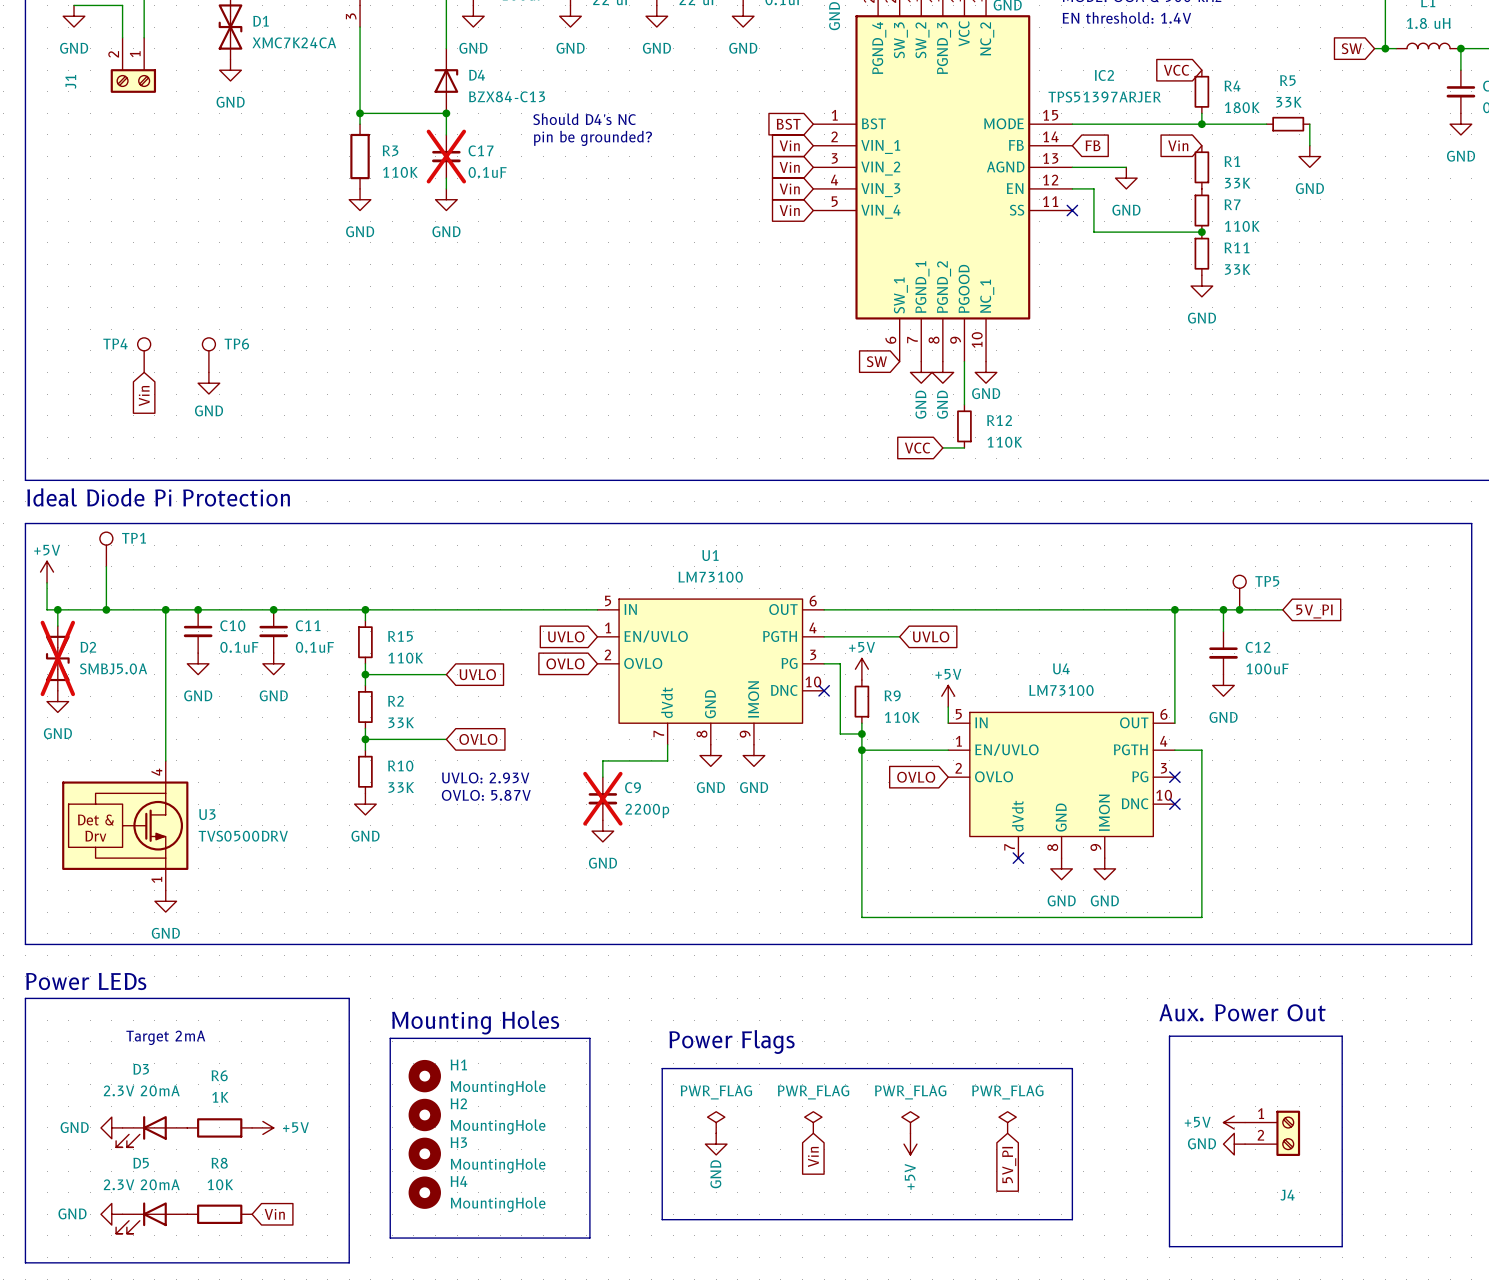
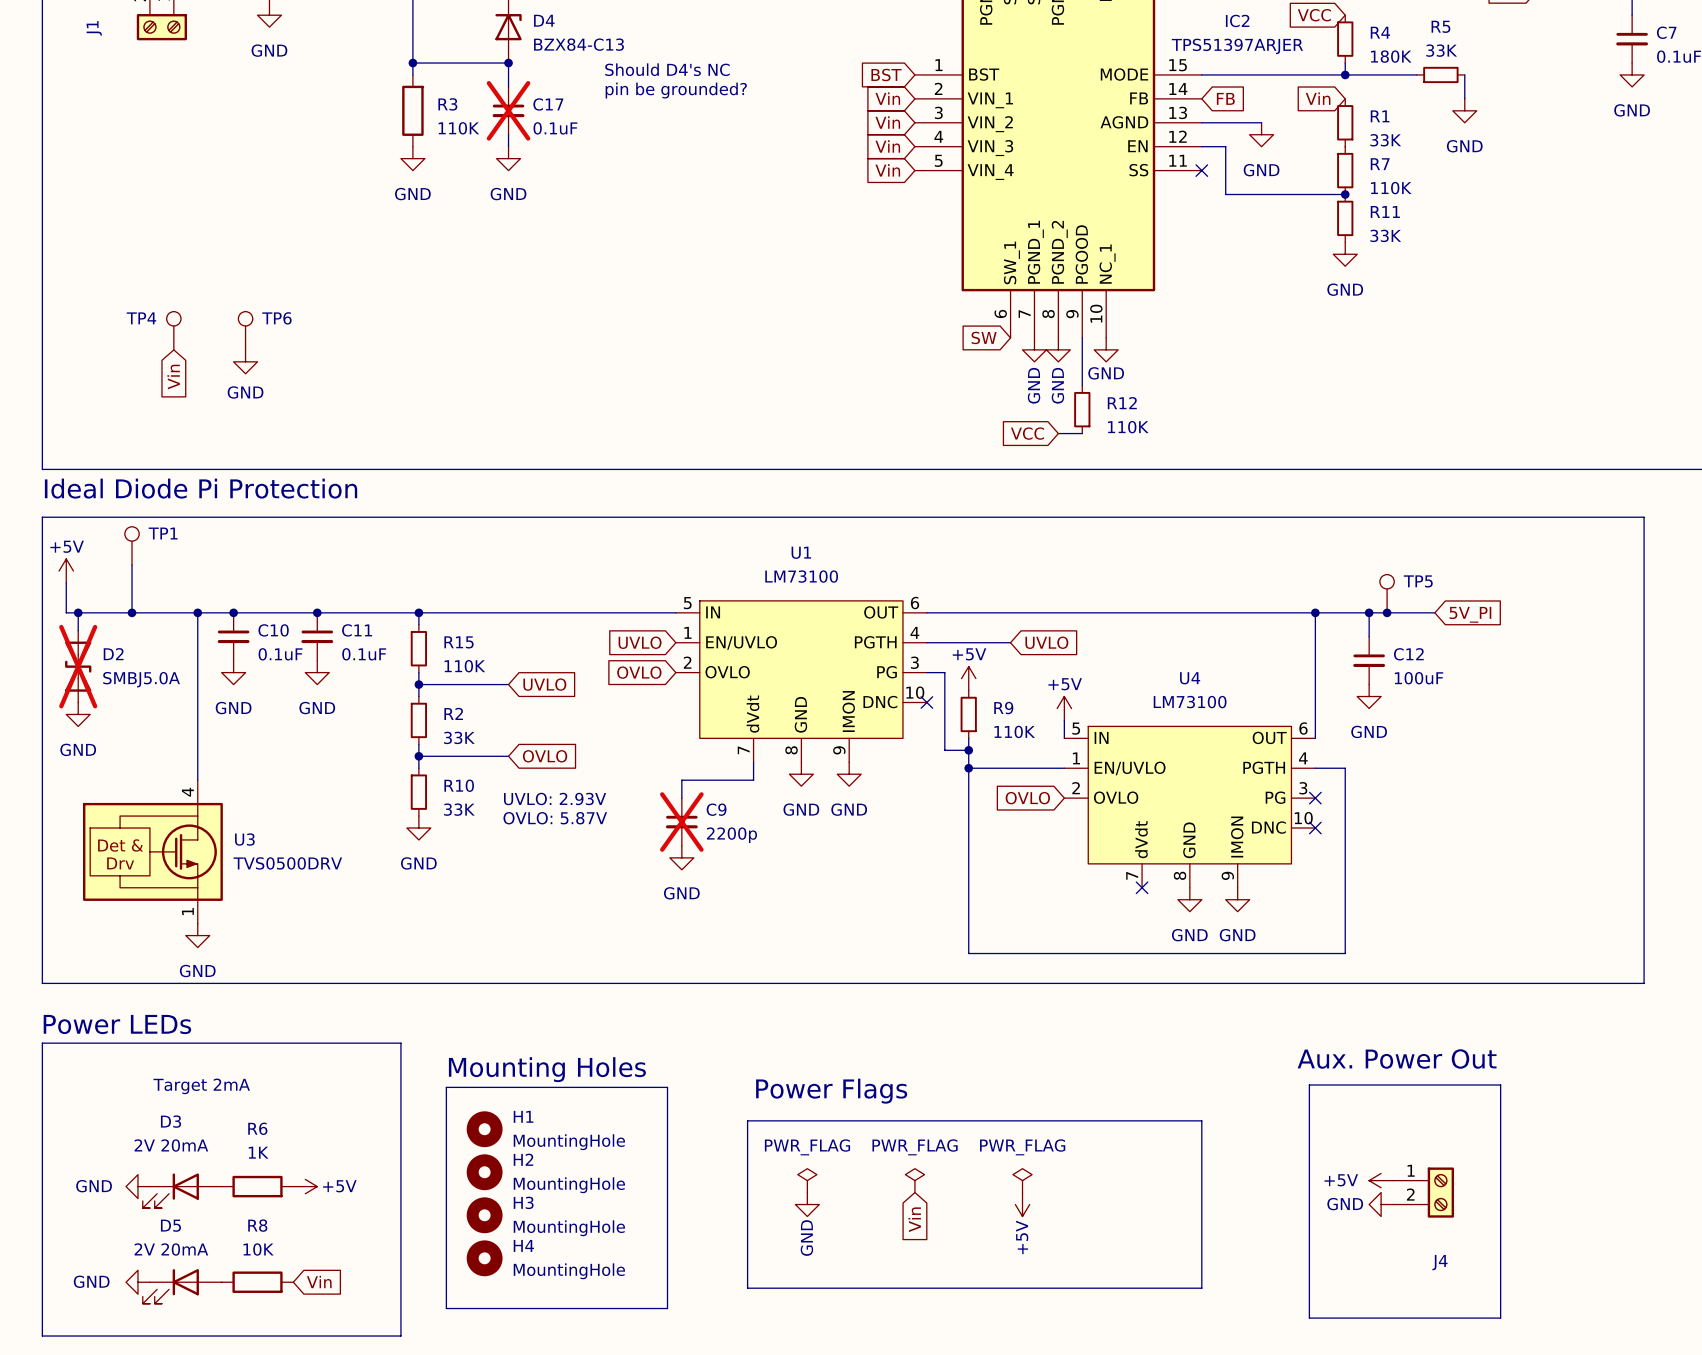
D3 value: 2.3V 20mA (141, 1090) -> 2V 20mA (171, 1145)
power symbol: PWR_FLAG (1007, 1122) -> none
global label: 5V_PI (1009, 1165) -> none
D5 value: 2.3V 20mA (141, 1184) -> 2V 20mA (171, 1249)

